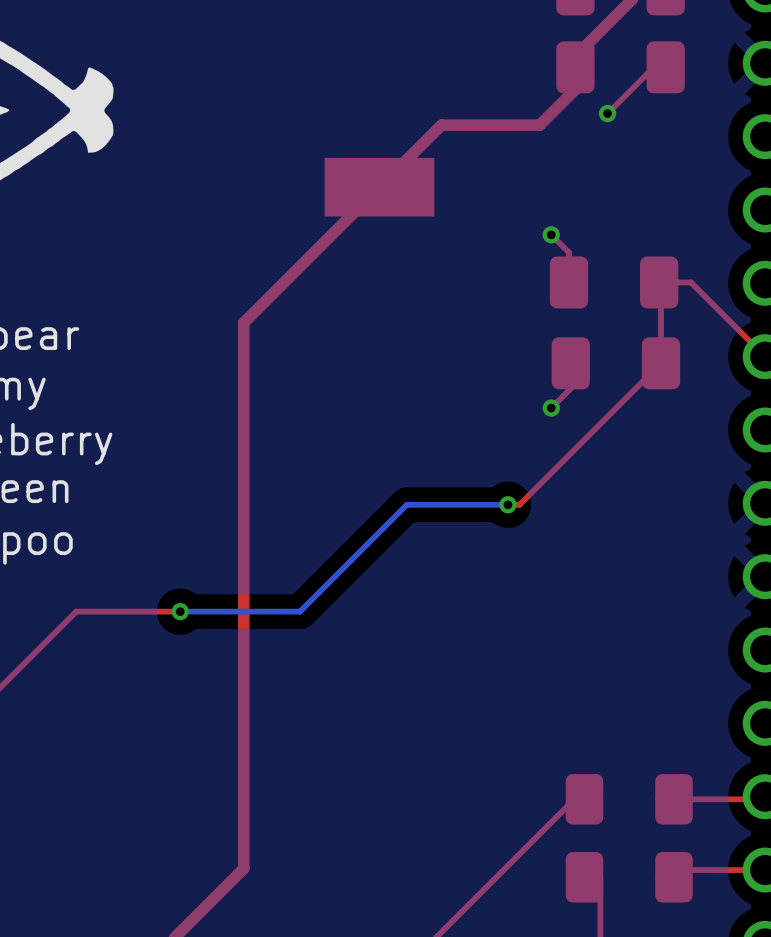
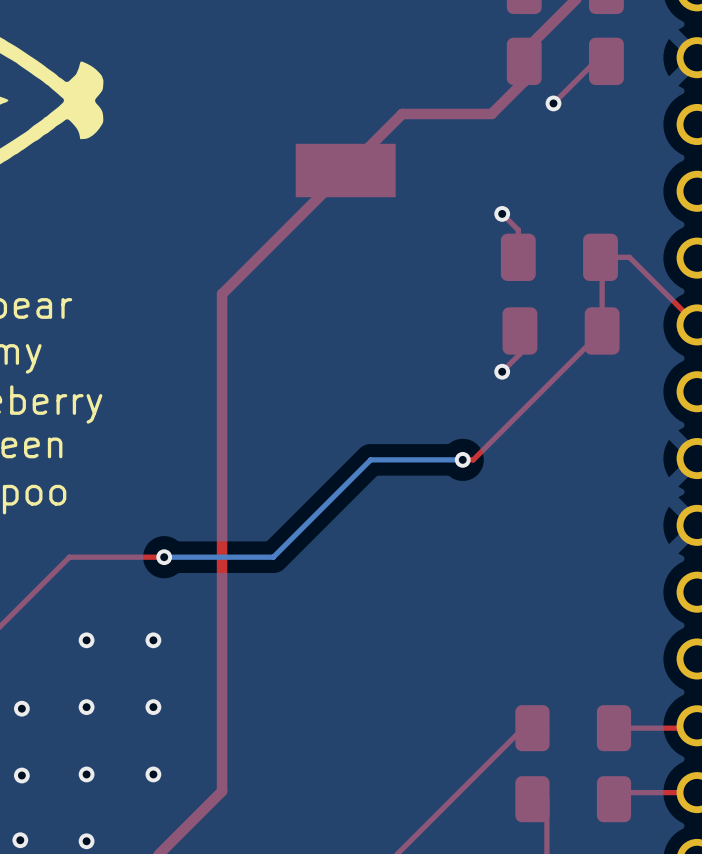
via: none -> (86, 640)
via: none -> (153, 640)
via: none -> (86, 707)
via: none -> (153, 707)
via: none -> (21, 708)
via: none -> (86, 774)
via: none -> (153, 774)
via: none -> (21, 775)
via: none -> (20, 840)
via: none -> (86, 841)

